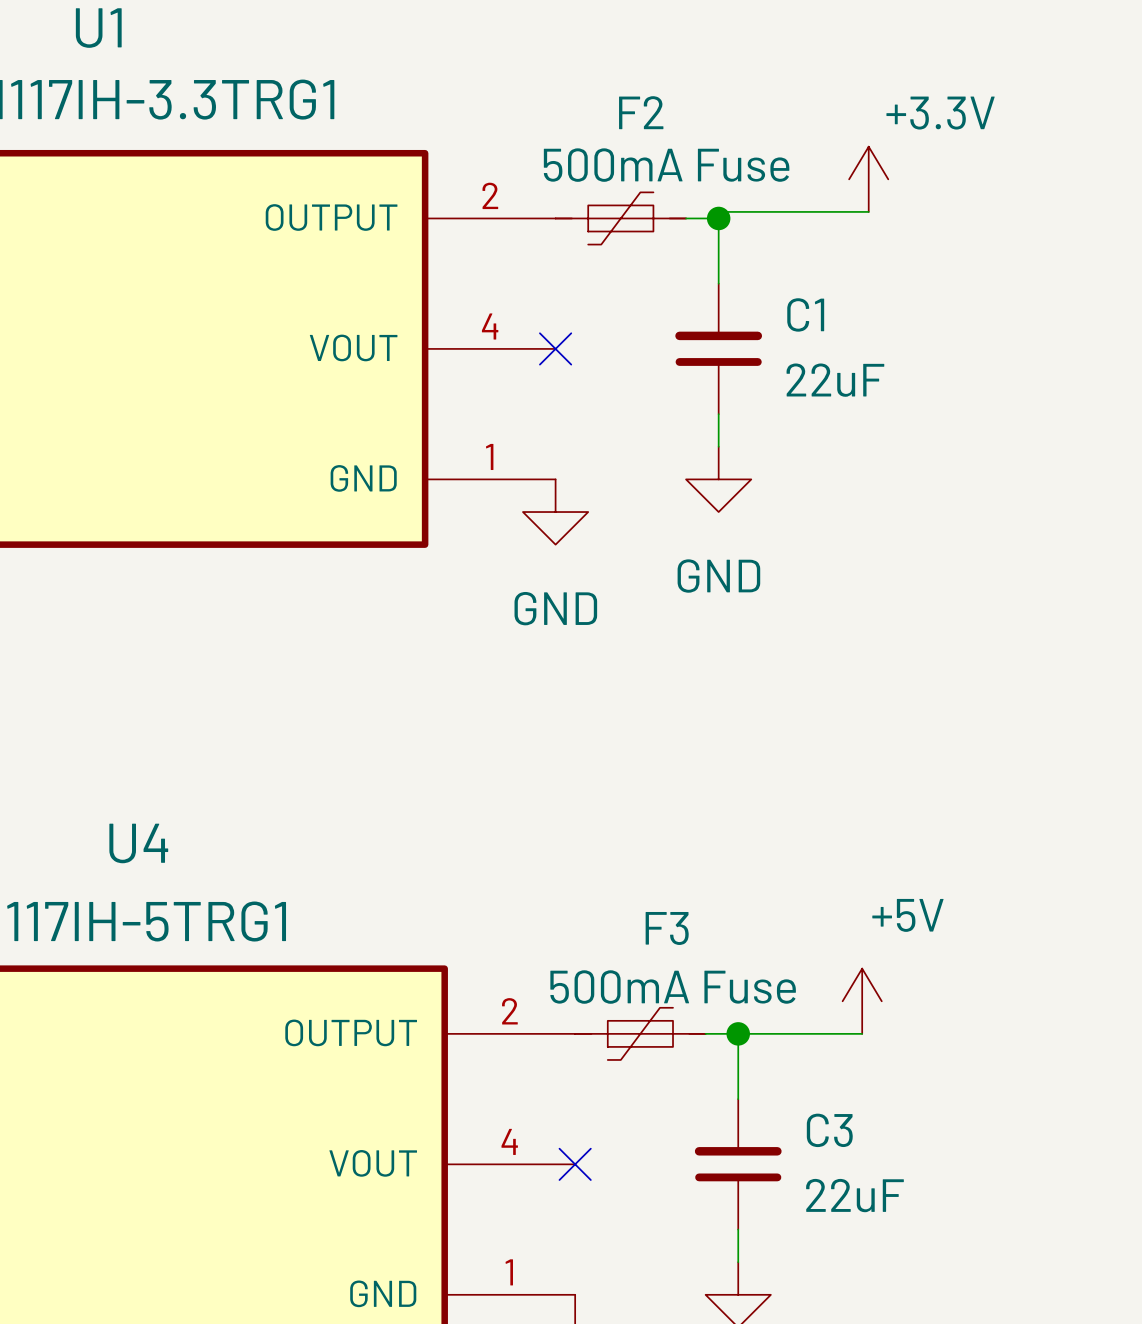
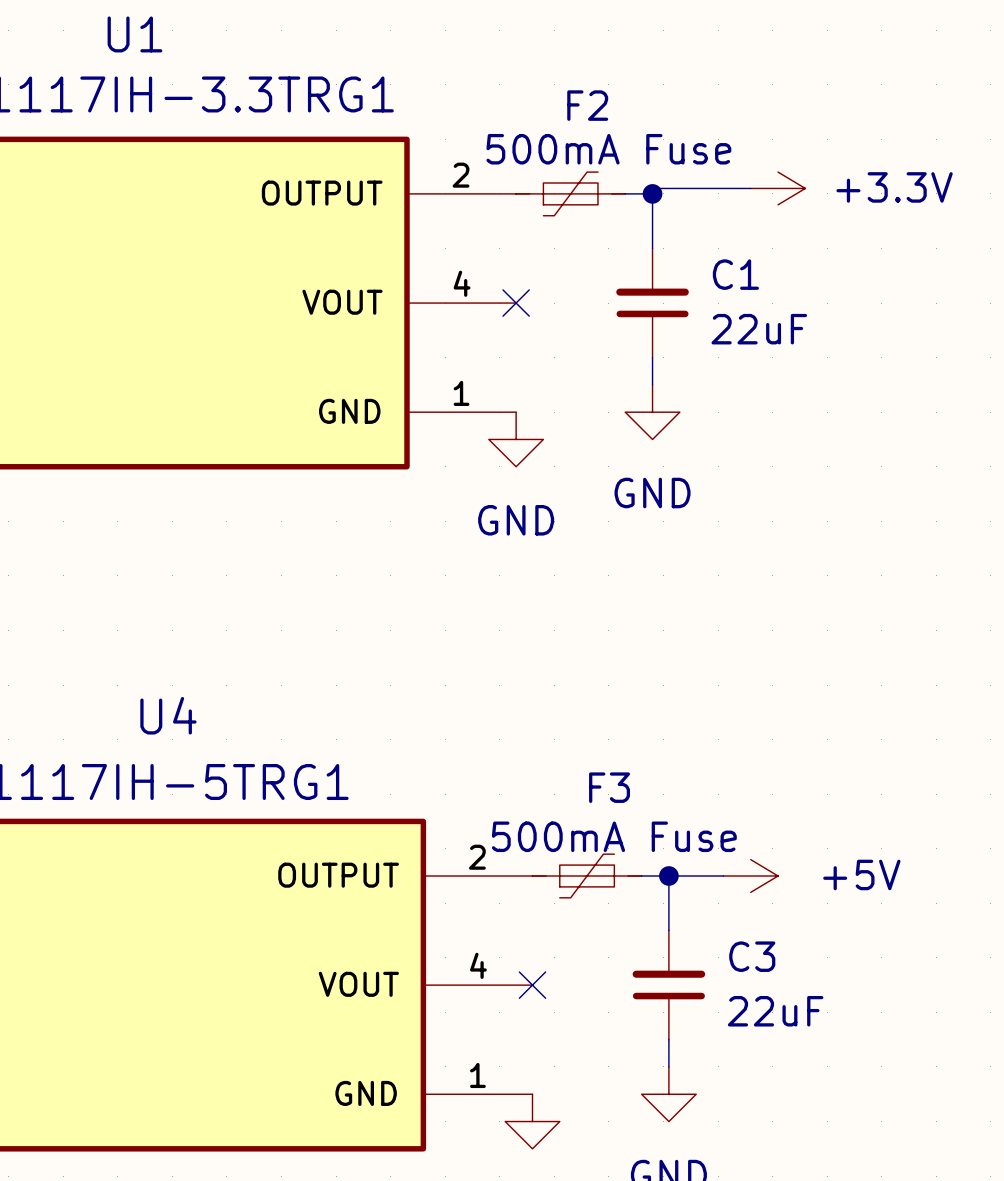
power symbol text position: +3.3V (940, 113) -> +3.3V (894, 187)
power symbol rotation: 0° (868, 179) -> 90° clockwise (778, 188)
power symbol text position: +5V (907, 915) -> +5V (861, 874)
power symbol rotation: 0° (862, 1001) -> 90° clockwise (750, 875)
power symbol position: +5V (862, 1001) -> +5V (750, 875)

